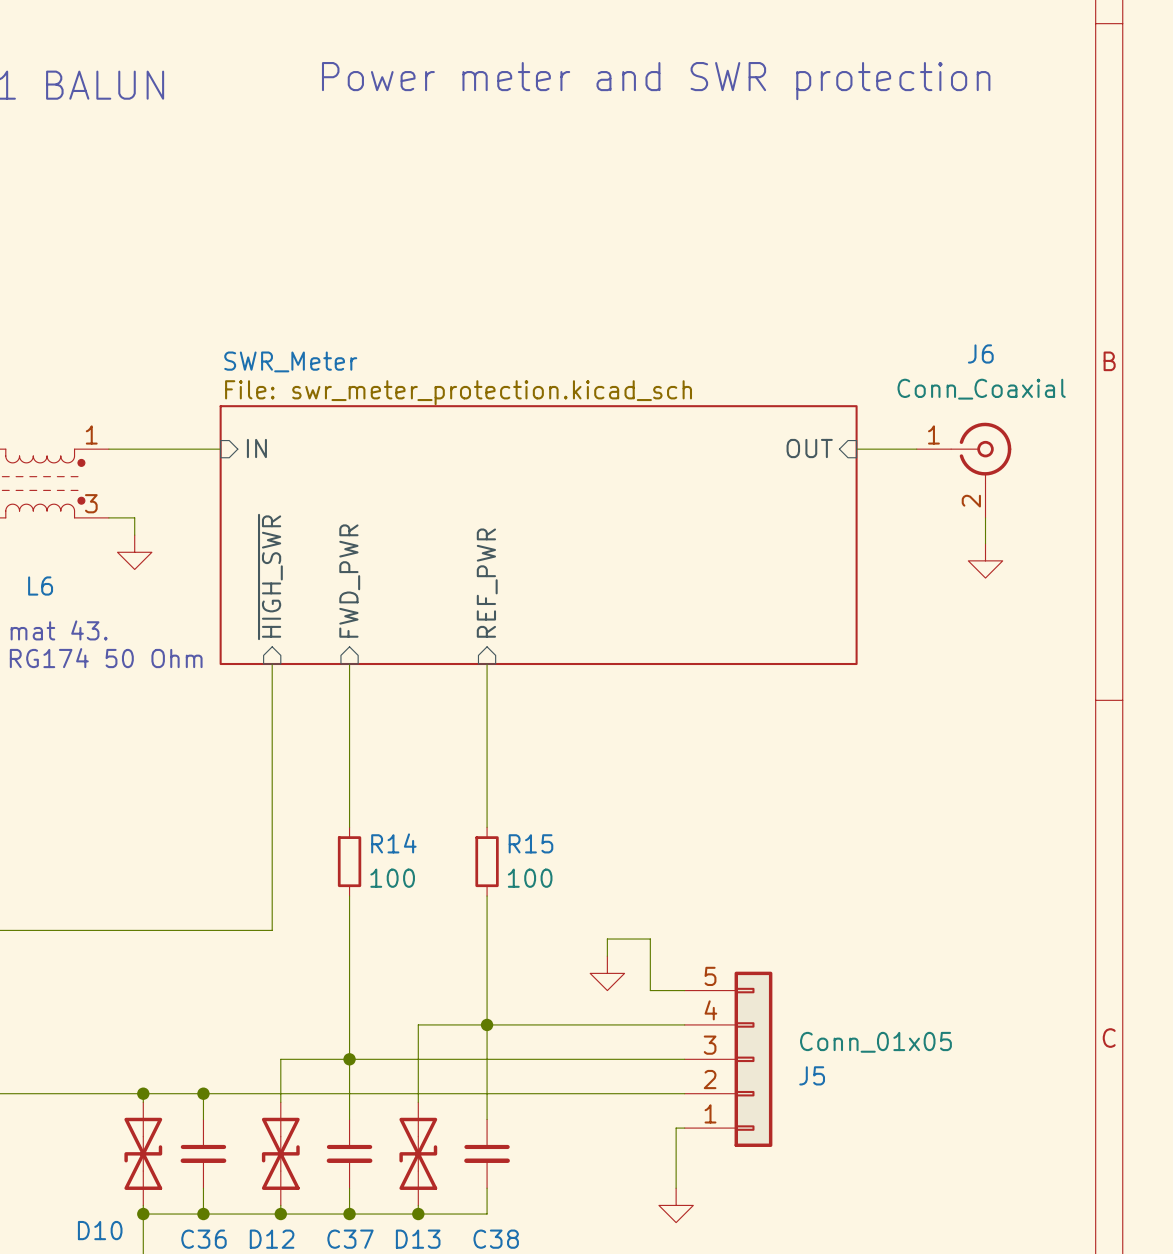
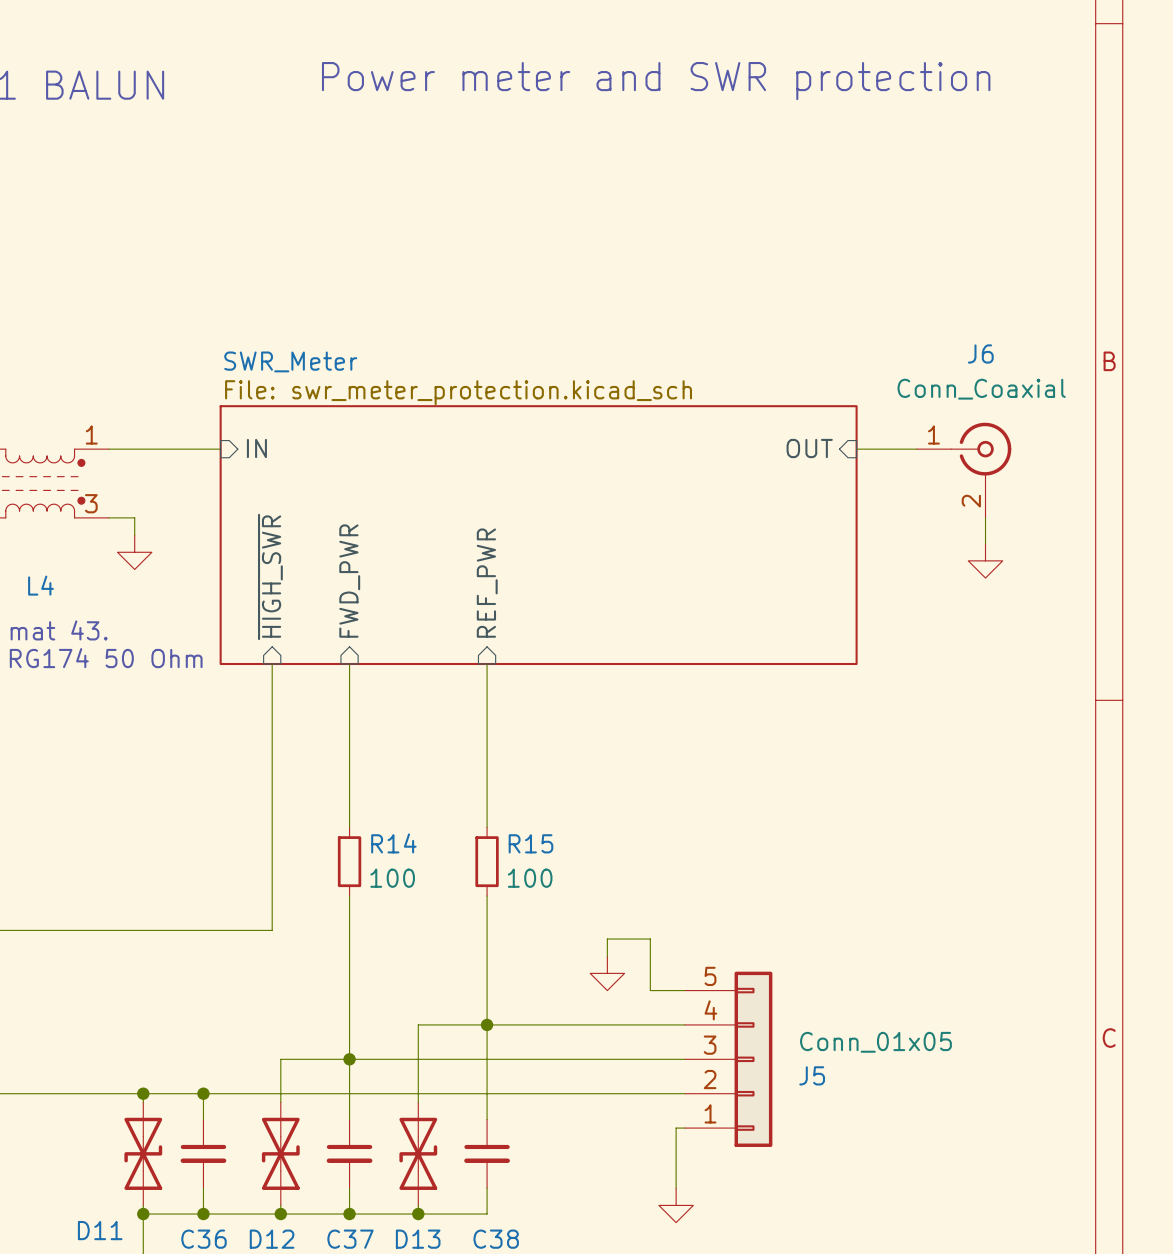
L6 name: L6 (40, 586) -> L4 (40, 585)
D10 name: D10 (100, 1230) -> D11 (100, 1230)

